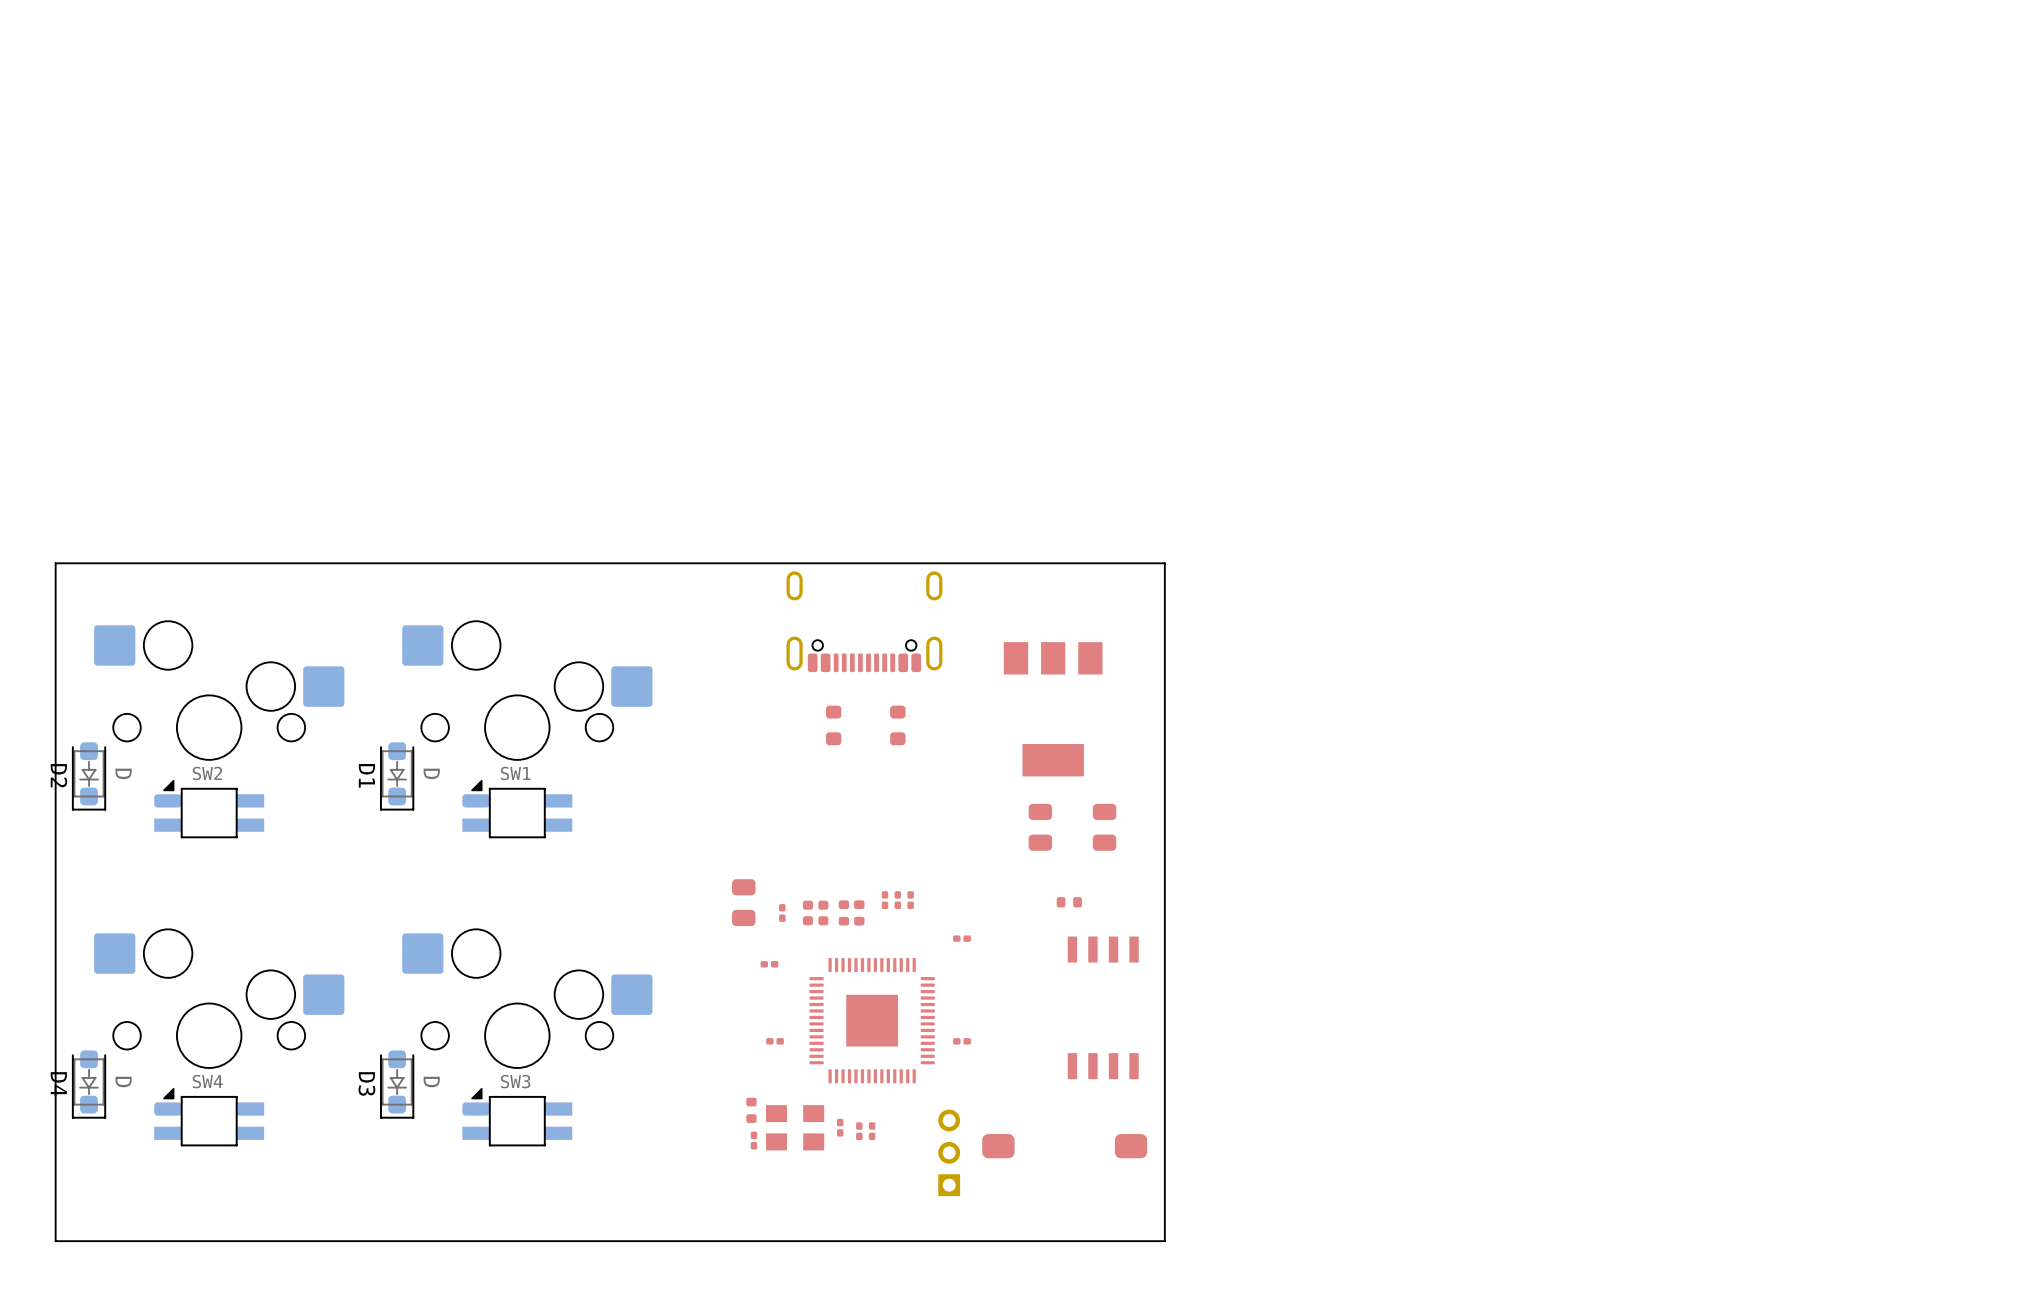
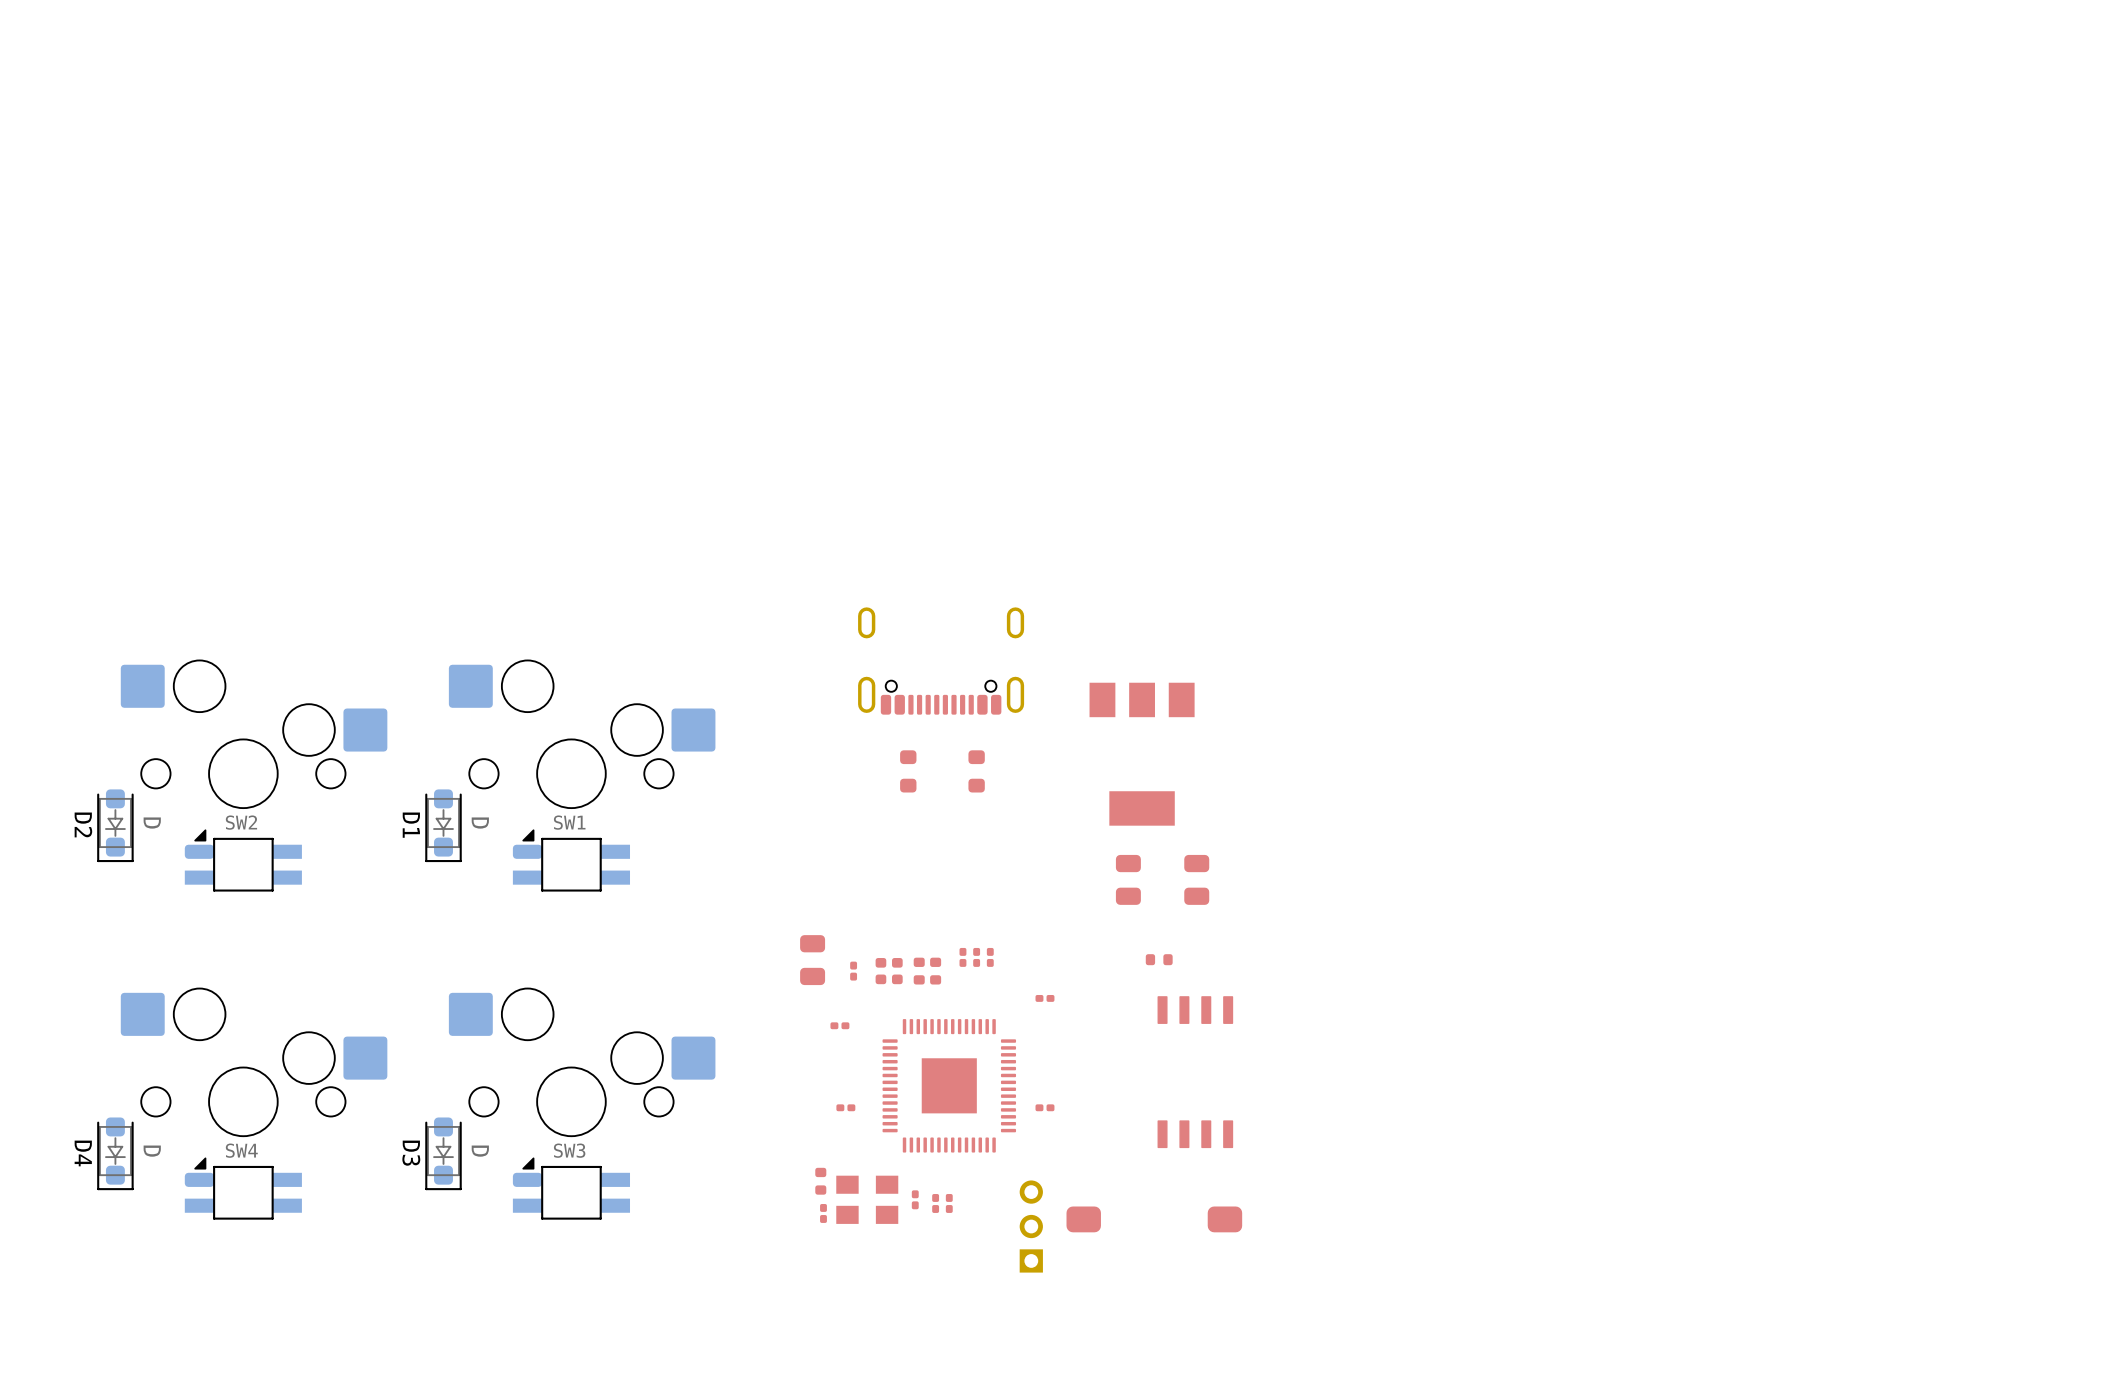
board edge: (1164, 563) (55, 563) (55, 1241) (1164, 1241) (1164, 563) -> none

